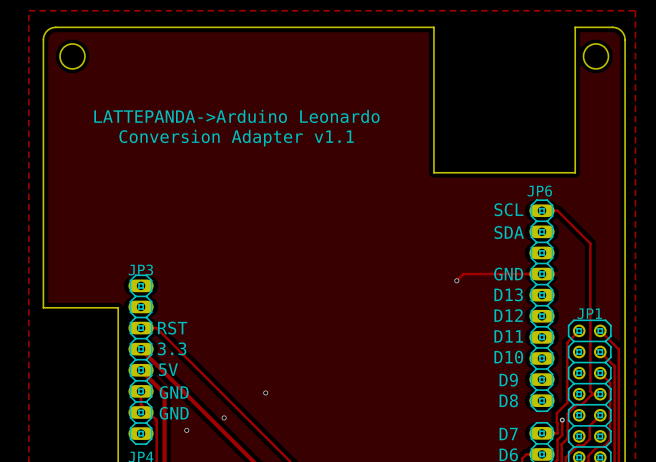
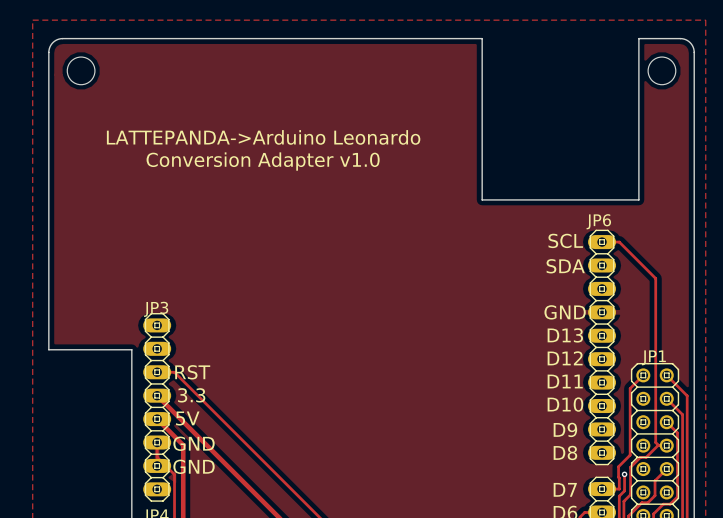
text: Conversion Adapter v1.1 (236, 138) -> Conversion Adapter v1.0 (263, 161)
track: (541, 274) (463, 274) (456, 280) -> none
via: (456, 280) -> none
via: (265, 392) -> none
via: (224, 417) -> none
via: (186, 430) -> none

